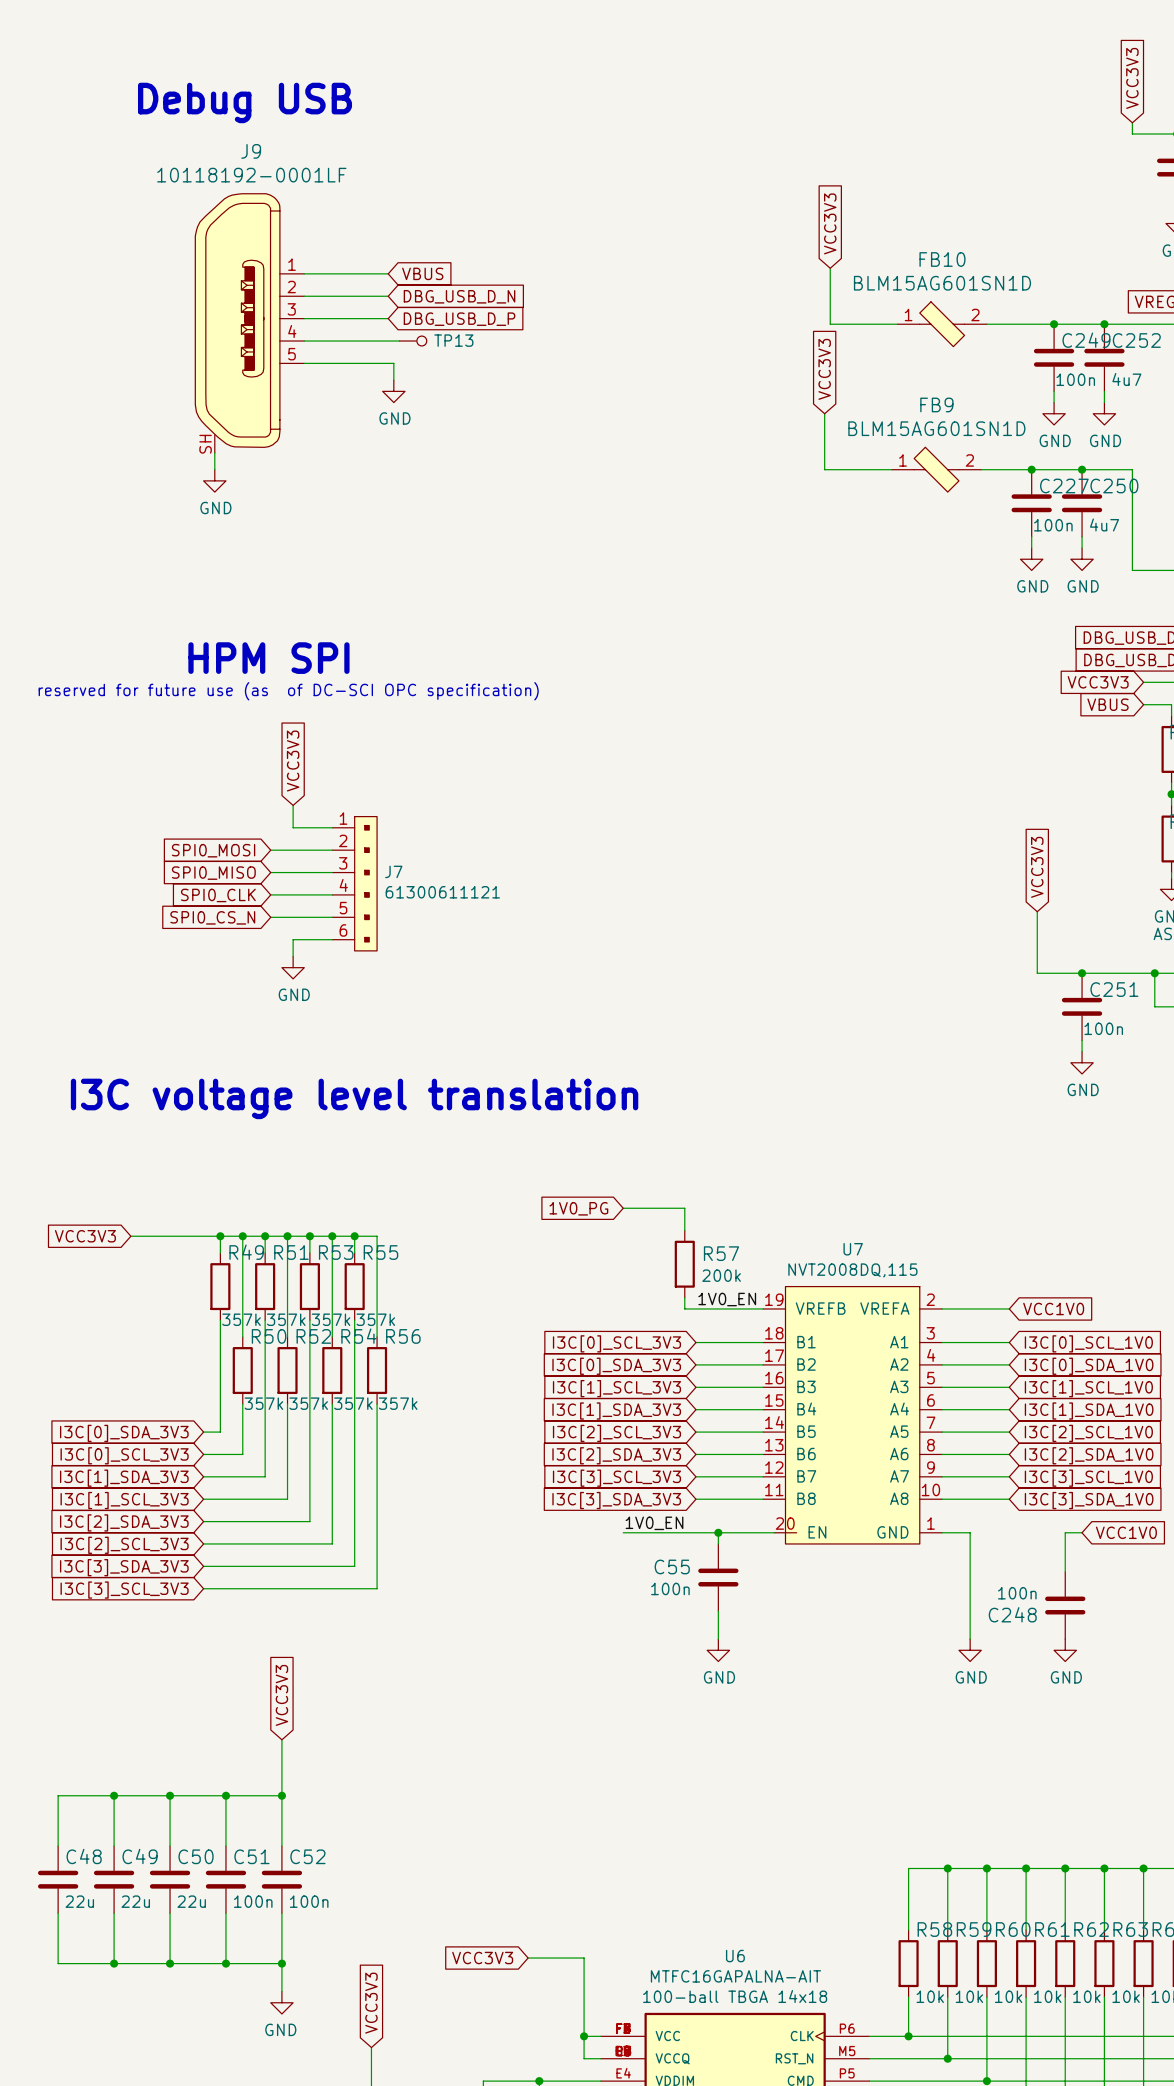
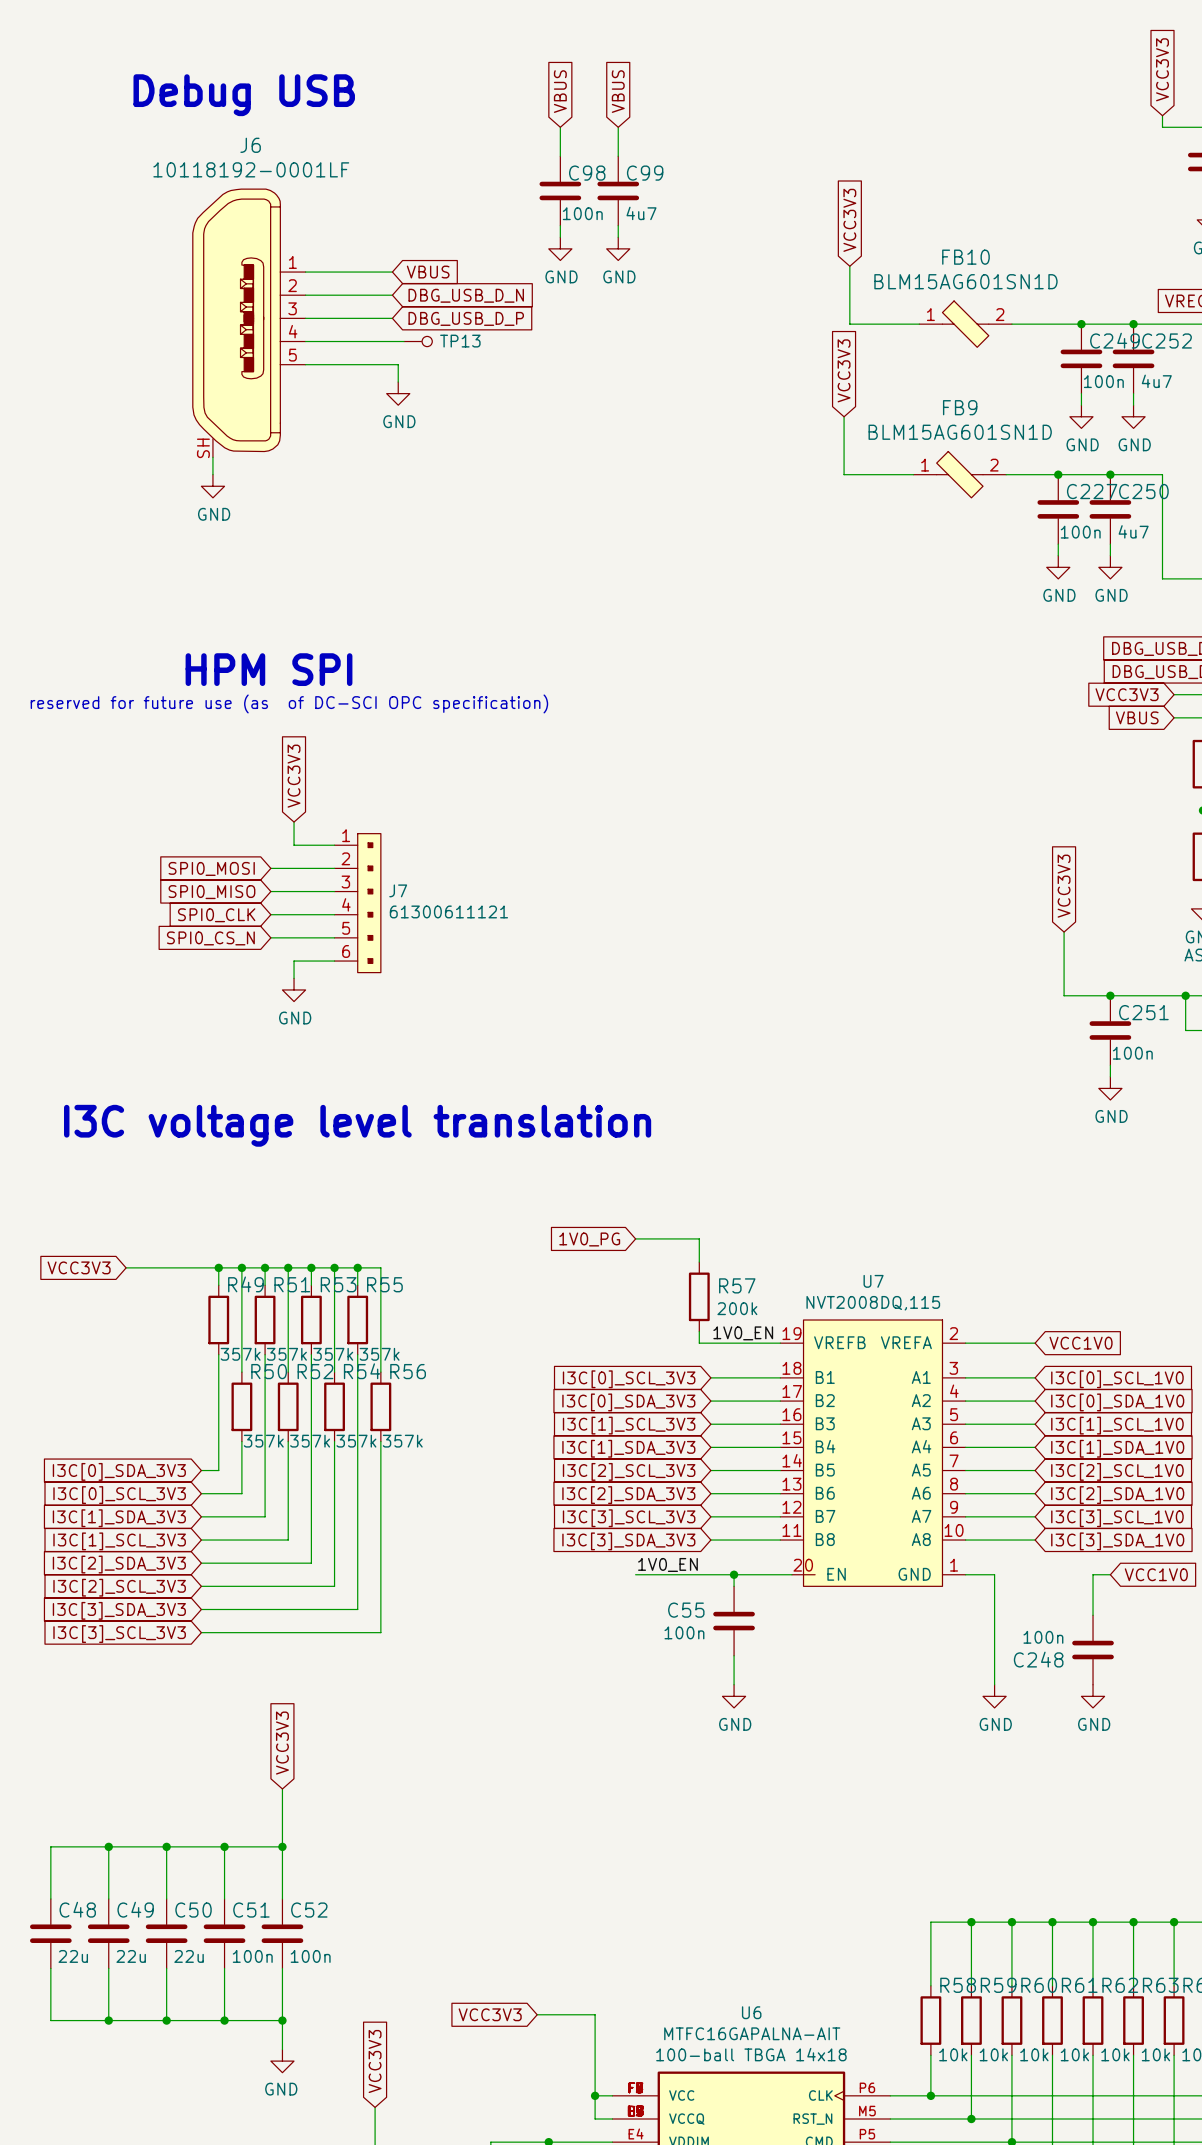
global label: none -> VBUS (560, 91)
global label: none -> VBUS (618, 91)
wire: none -> (560, 127) (560, 156)
wire: none -> (618, 127) (618, 156)
J9 name: J9 (251, 151) -> J6 (250, 145)
C98: none -> (560, 190)
C99: none -> (618, 190)
wire: none -> (560, 225) (560, 237)
wire: none -> (618, 225) (618, 237)
power symbol: none -> GND (560, 248)
power symbol: none -> GND (618, 248)

